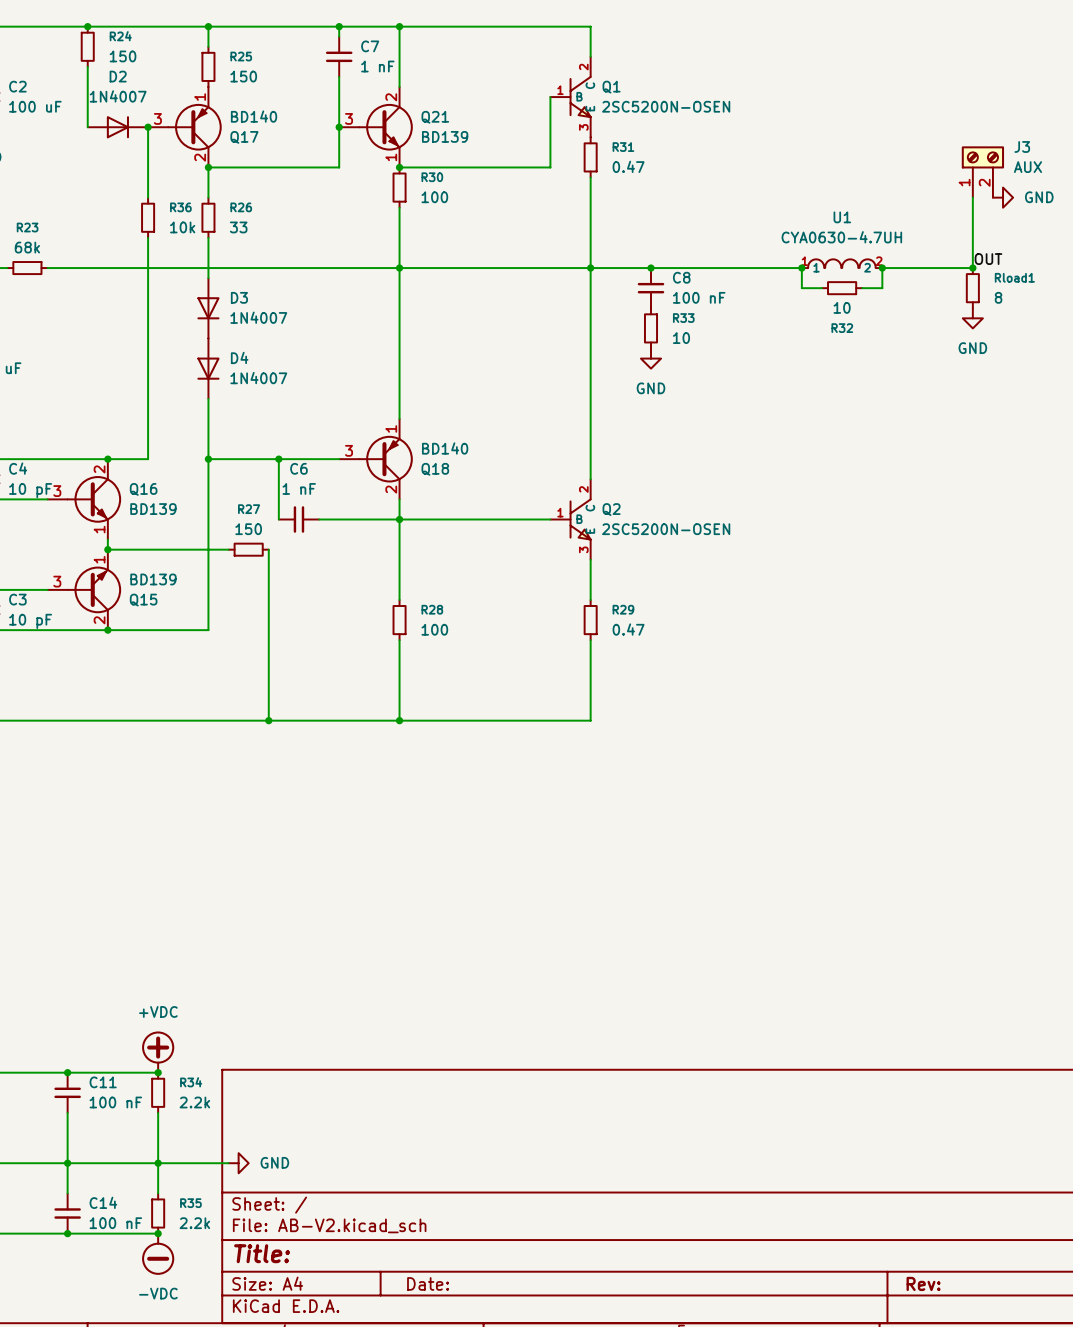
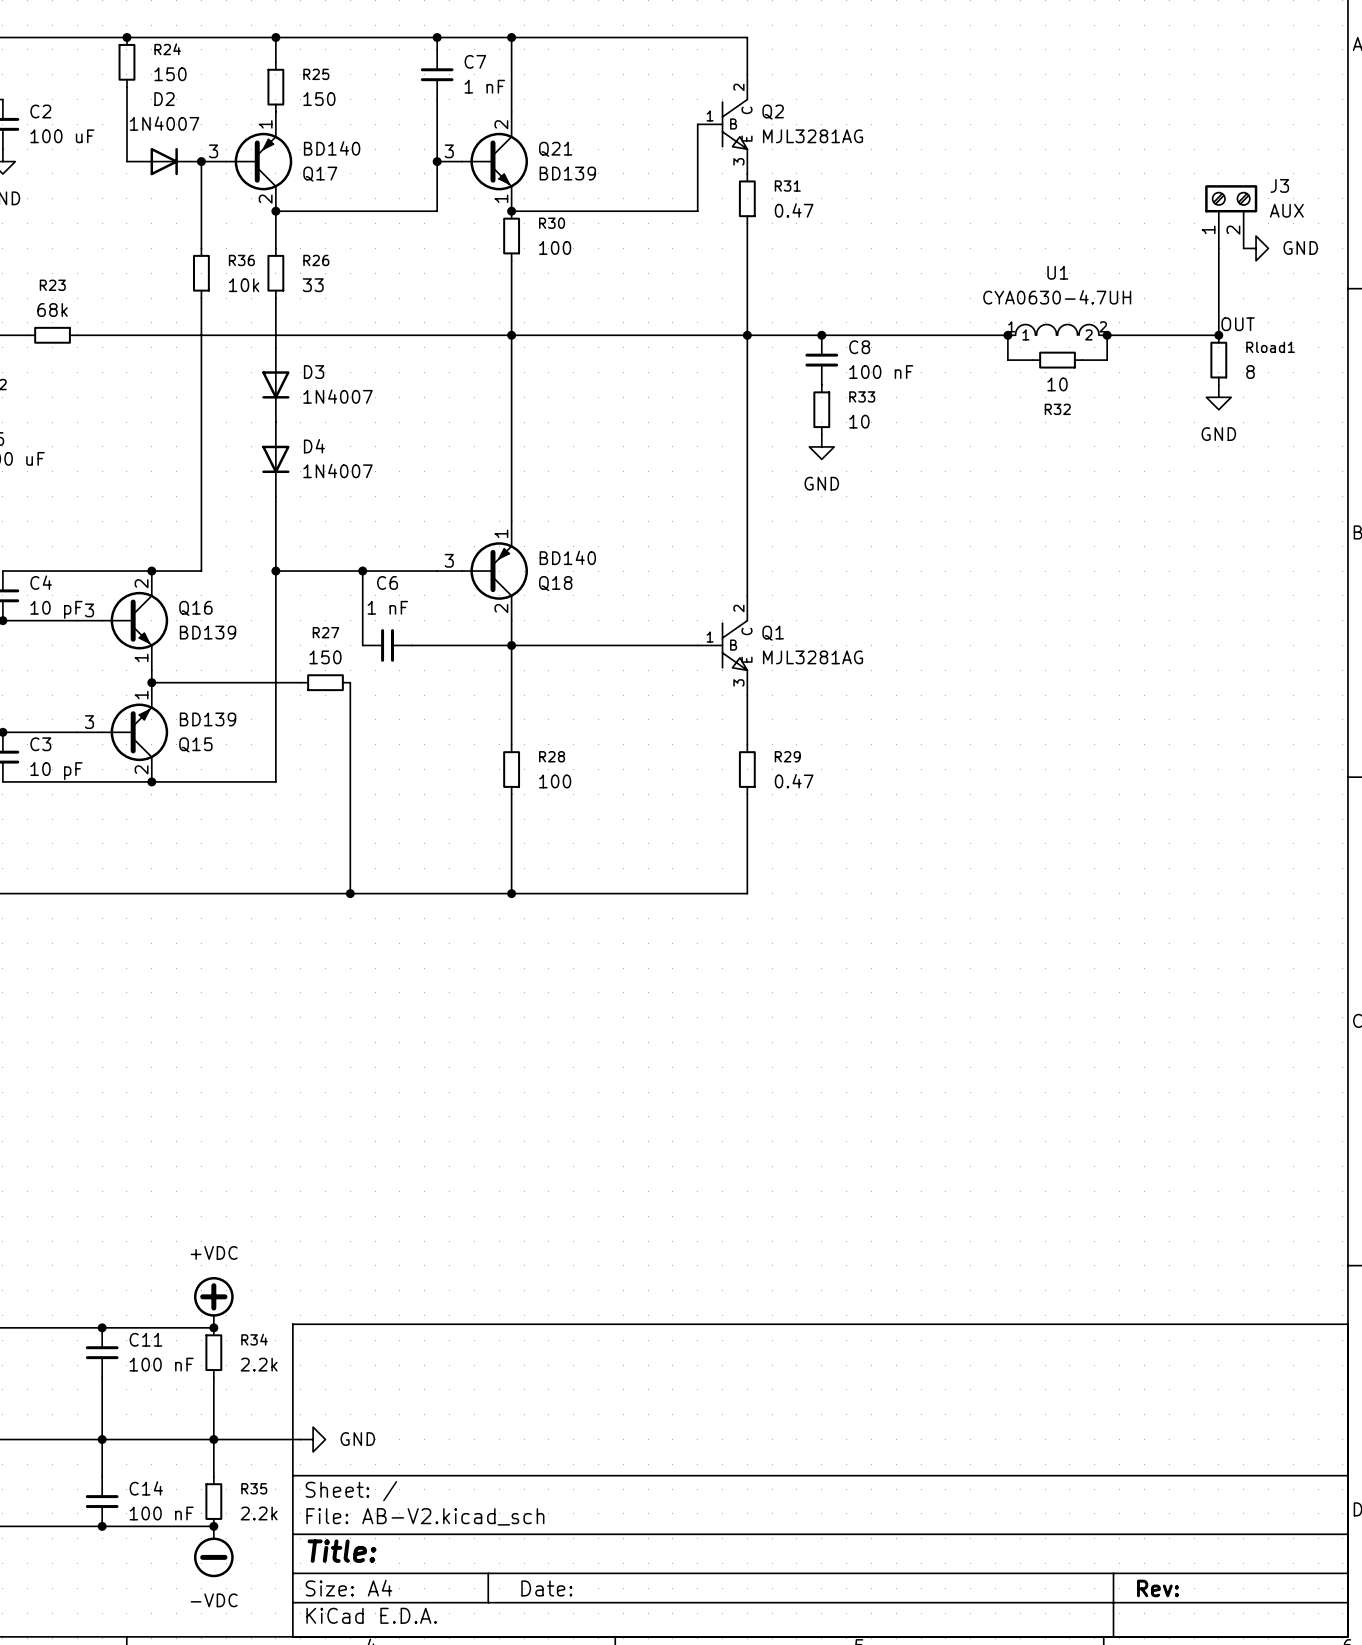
Q1 name: Q1 (611, 87) -> Q2 (773, 112)
Q1 value: 2SC5200N-OSEN (666, 106) -> MJL3281AG (813, 136)
Q2 name: Q2 (611, 509) -> Q1 (773, 633)
Q2 value: 2SC5200N-OSEN (666, 529) -> MJL3281AG (813, 657)

